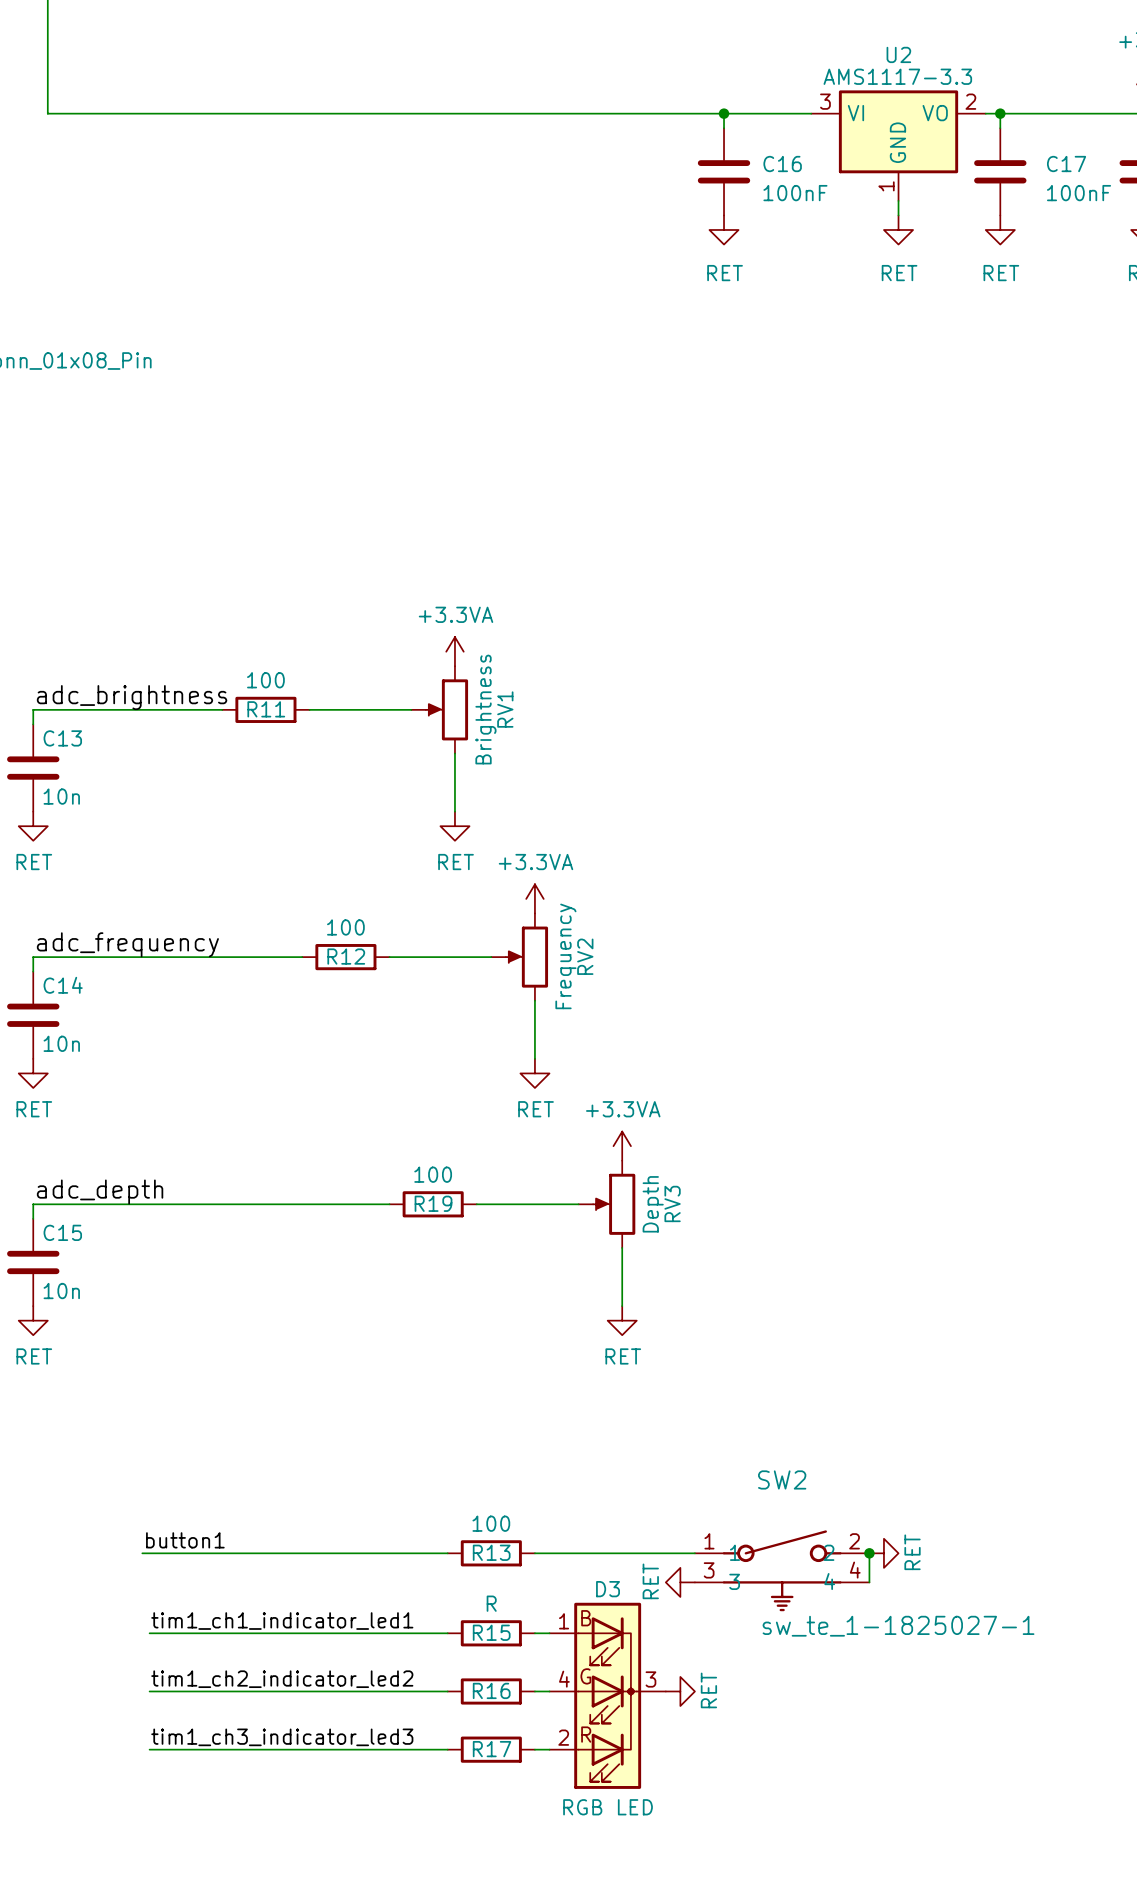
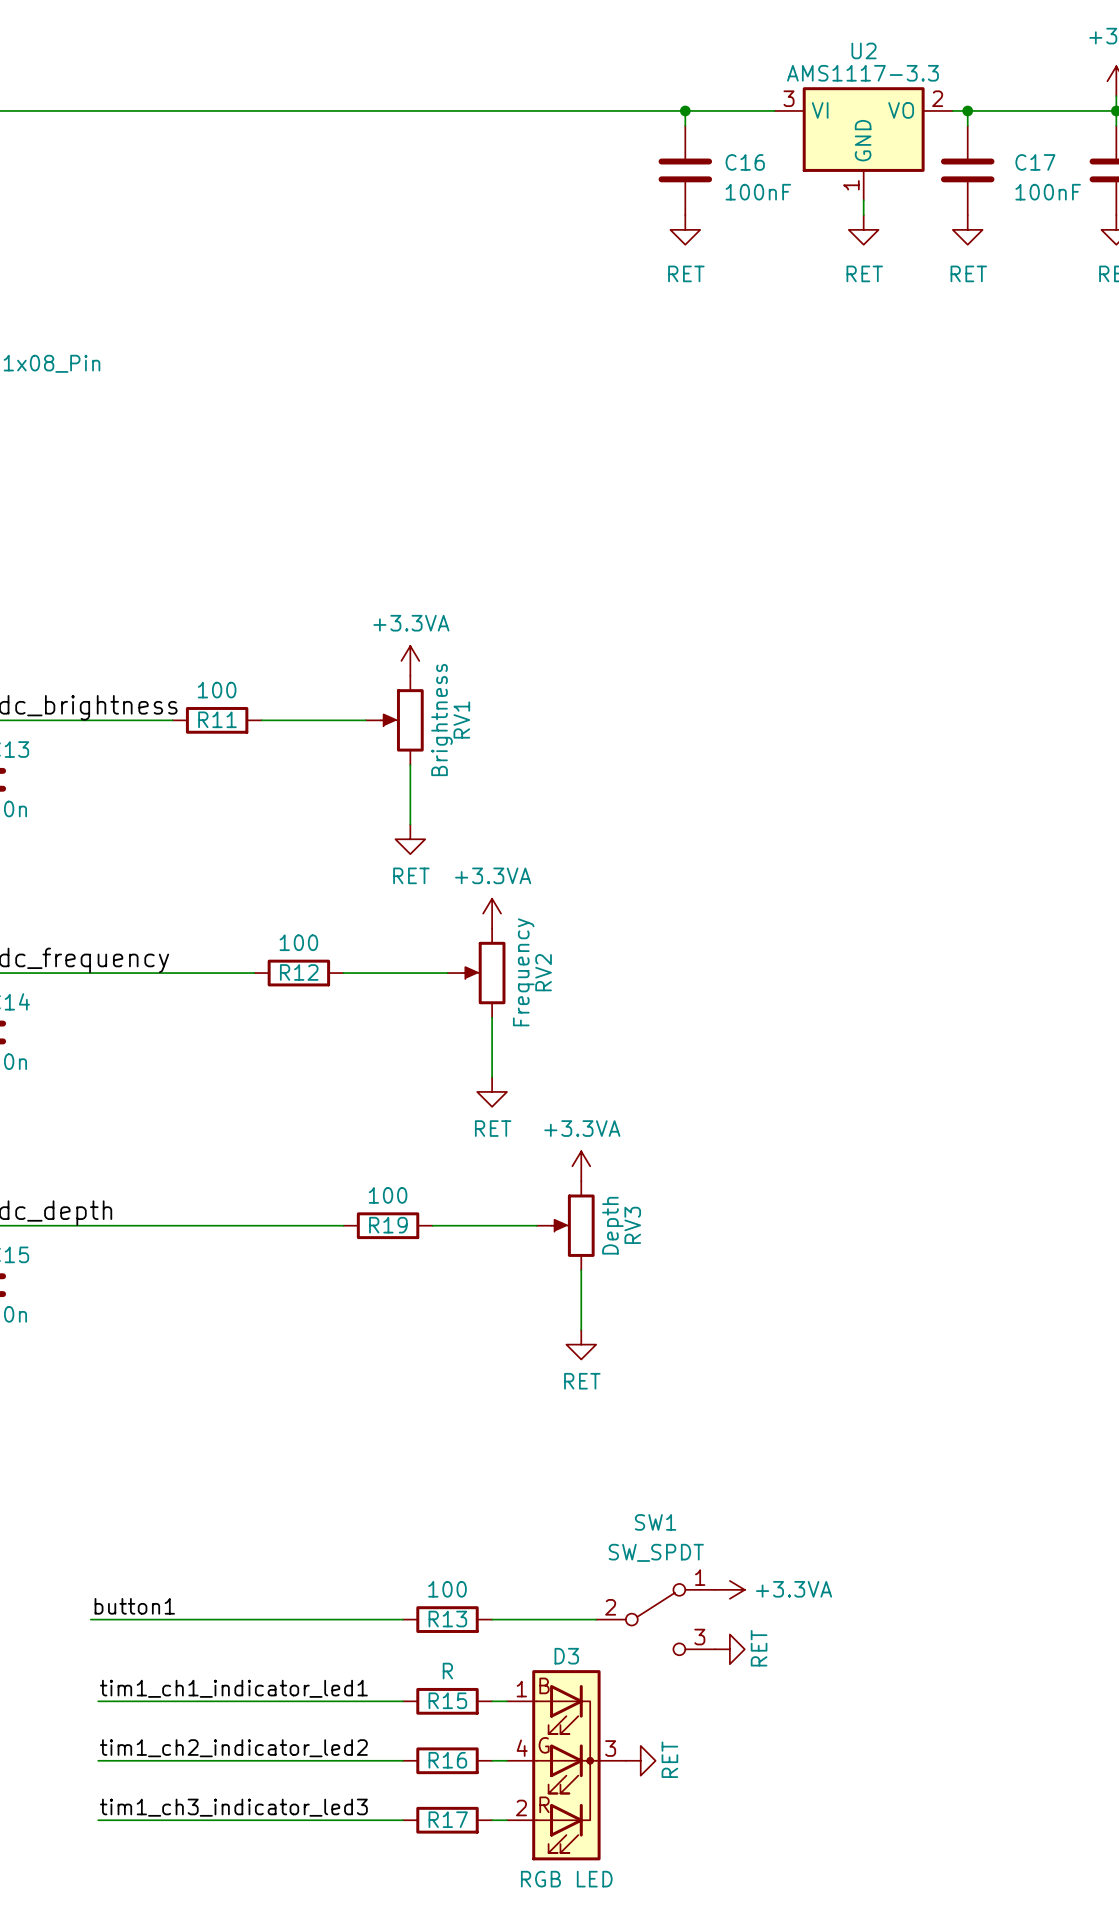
label position: button1 (185, 1540) -> button1 (134, 1606)
wire: (142, 1553) (447, 1553) -> (90, 1619) (402, 1619)
R13 position: (491, 1553) -> (447, 1619)
wire: (534, 1553) (694, 1553) -> none
wire: (869, 1553) (869, 1582) -> none
junction: (869, 1553) -> none
power symbol: RET (883, 1553) -> none
power symbol: none -> +3.3VA (729, 1589)
SW2: sw_te_1-1825027-1 (782, 1570) -> none
power symbol: RET (680, 1582) -> none
wire: none -> (492, 1619) (596, 1619)
SW1: none -> SW_SPDT (655, 1619)
power symbol: none -> RET (729, 1649)
label position: tim1_ch1_indicator_led1 (282, 1621) -> tim1_ch1_indicator_led1 (233, 1688)
wire: (149, 1633) (447, 1633) -> (98, 1701) (402, 1701)
R15 position: (491, 1633) -> (447, 1701)
wire: (534, 1633) (549, 1633) -> (492, 1701) (506, 1701)
label position: tim1_ch2_indicator_led2 (282, 1679) -> tim1_ch2_indicator_led2 (233, 1748)
wire: (149, 1691) (447, 1691) -> (98, 1760) (402, 1760)
R16 position: (491, 1691) -> (447, 1760)
wire: (534, 1691) (549, 1691) -> (492, 1760) (506, 1760)
power symbol position: RET (680, 1691) -> RET (640, 1760)
D3 position: (607, 1695) -> (566, 1765)
label position: tim1_ch3_indicator_led3 (282, 1737) -> tim1_ch3_indicator_led3 (233, 1807)
wire: (149, 1749) (447, 1749) -> (98, 1820) (402, 1820)
R17 position: (491, 1749) -> (447, 1820)
wire: (534, 1749) (549, 1749) -> (492, 1820) (506, 1820)

